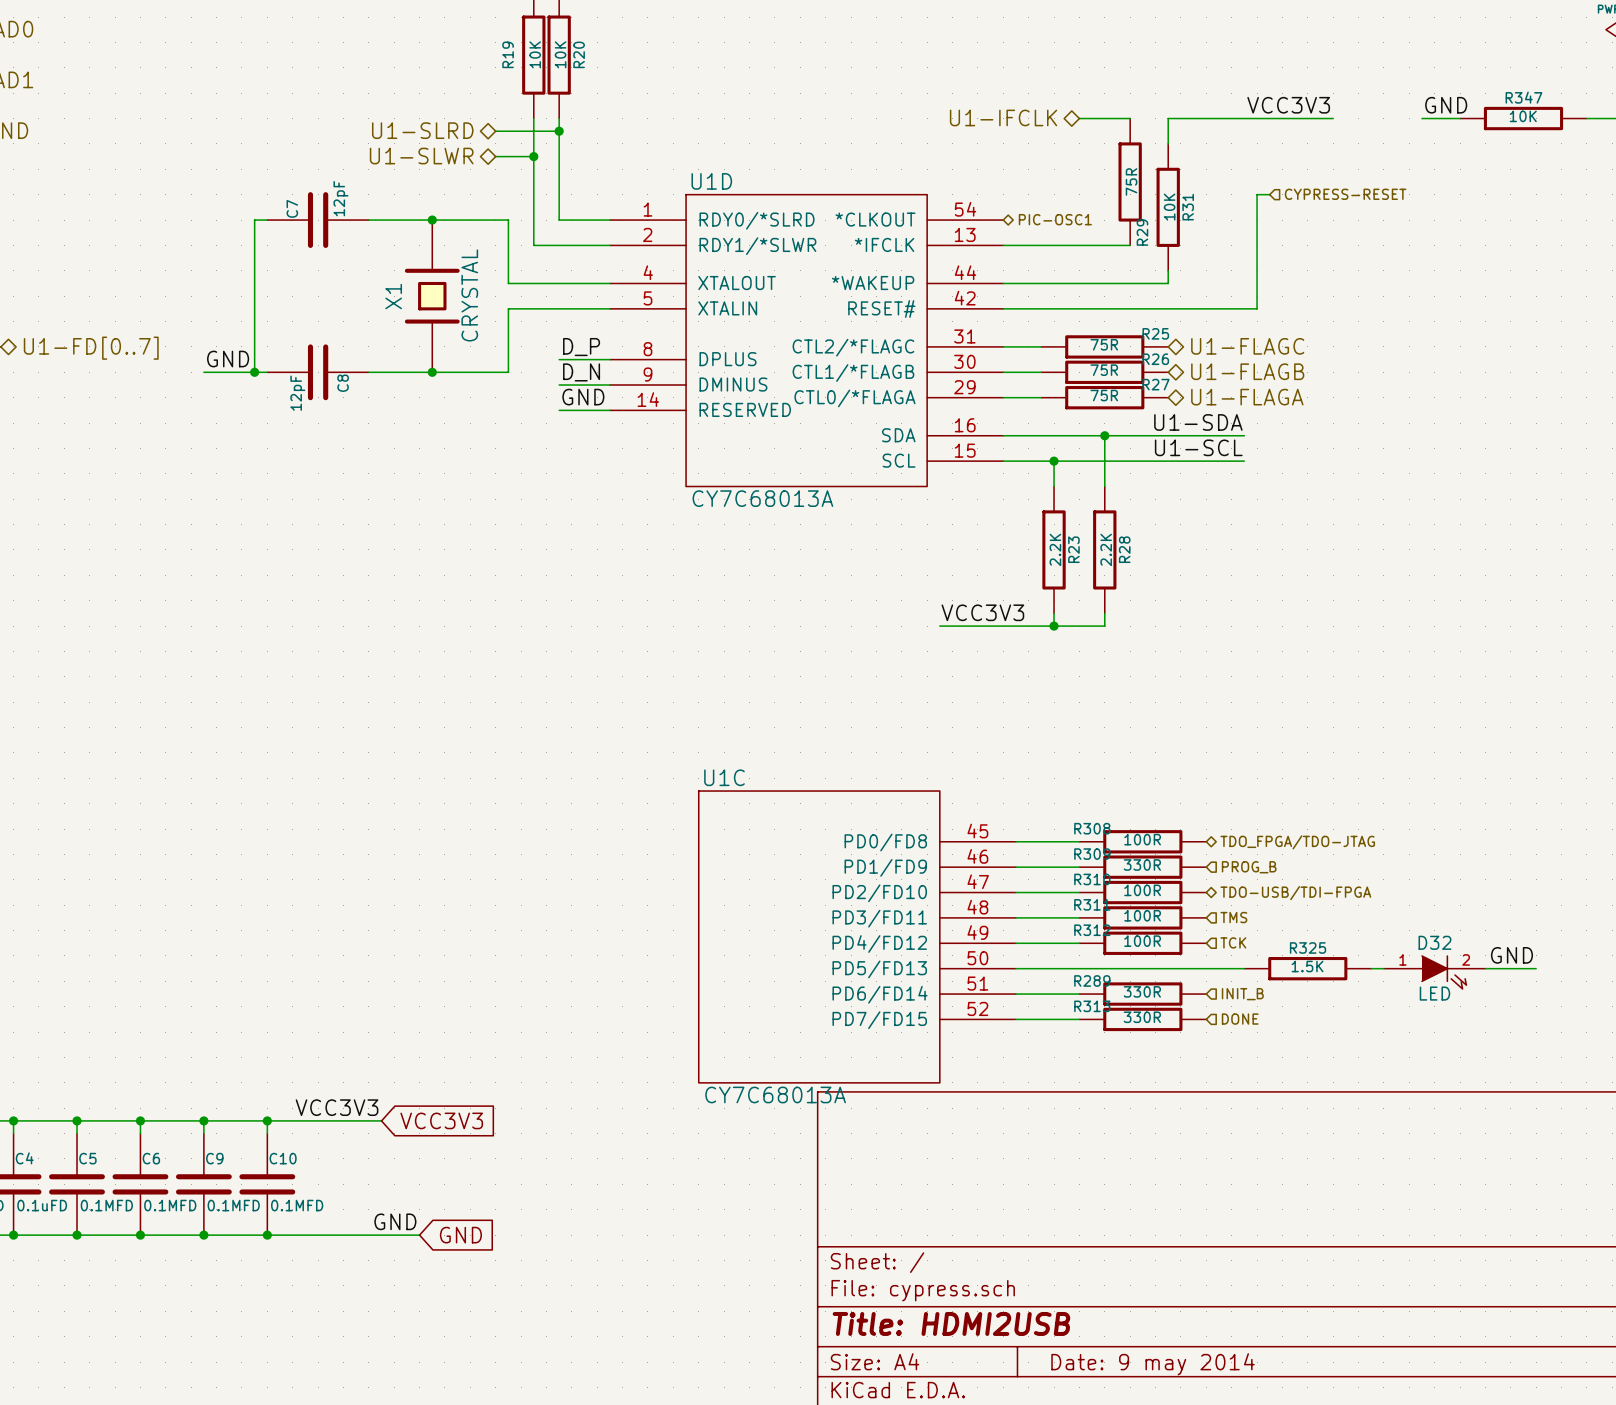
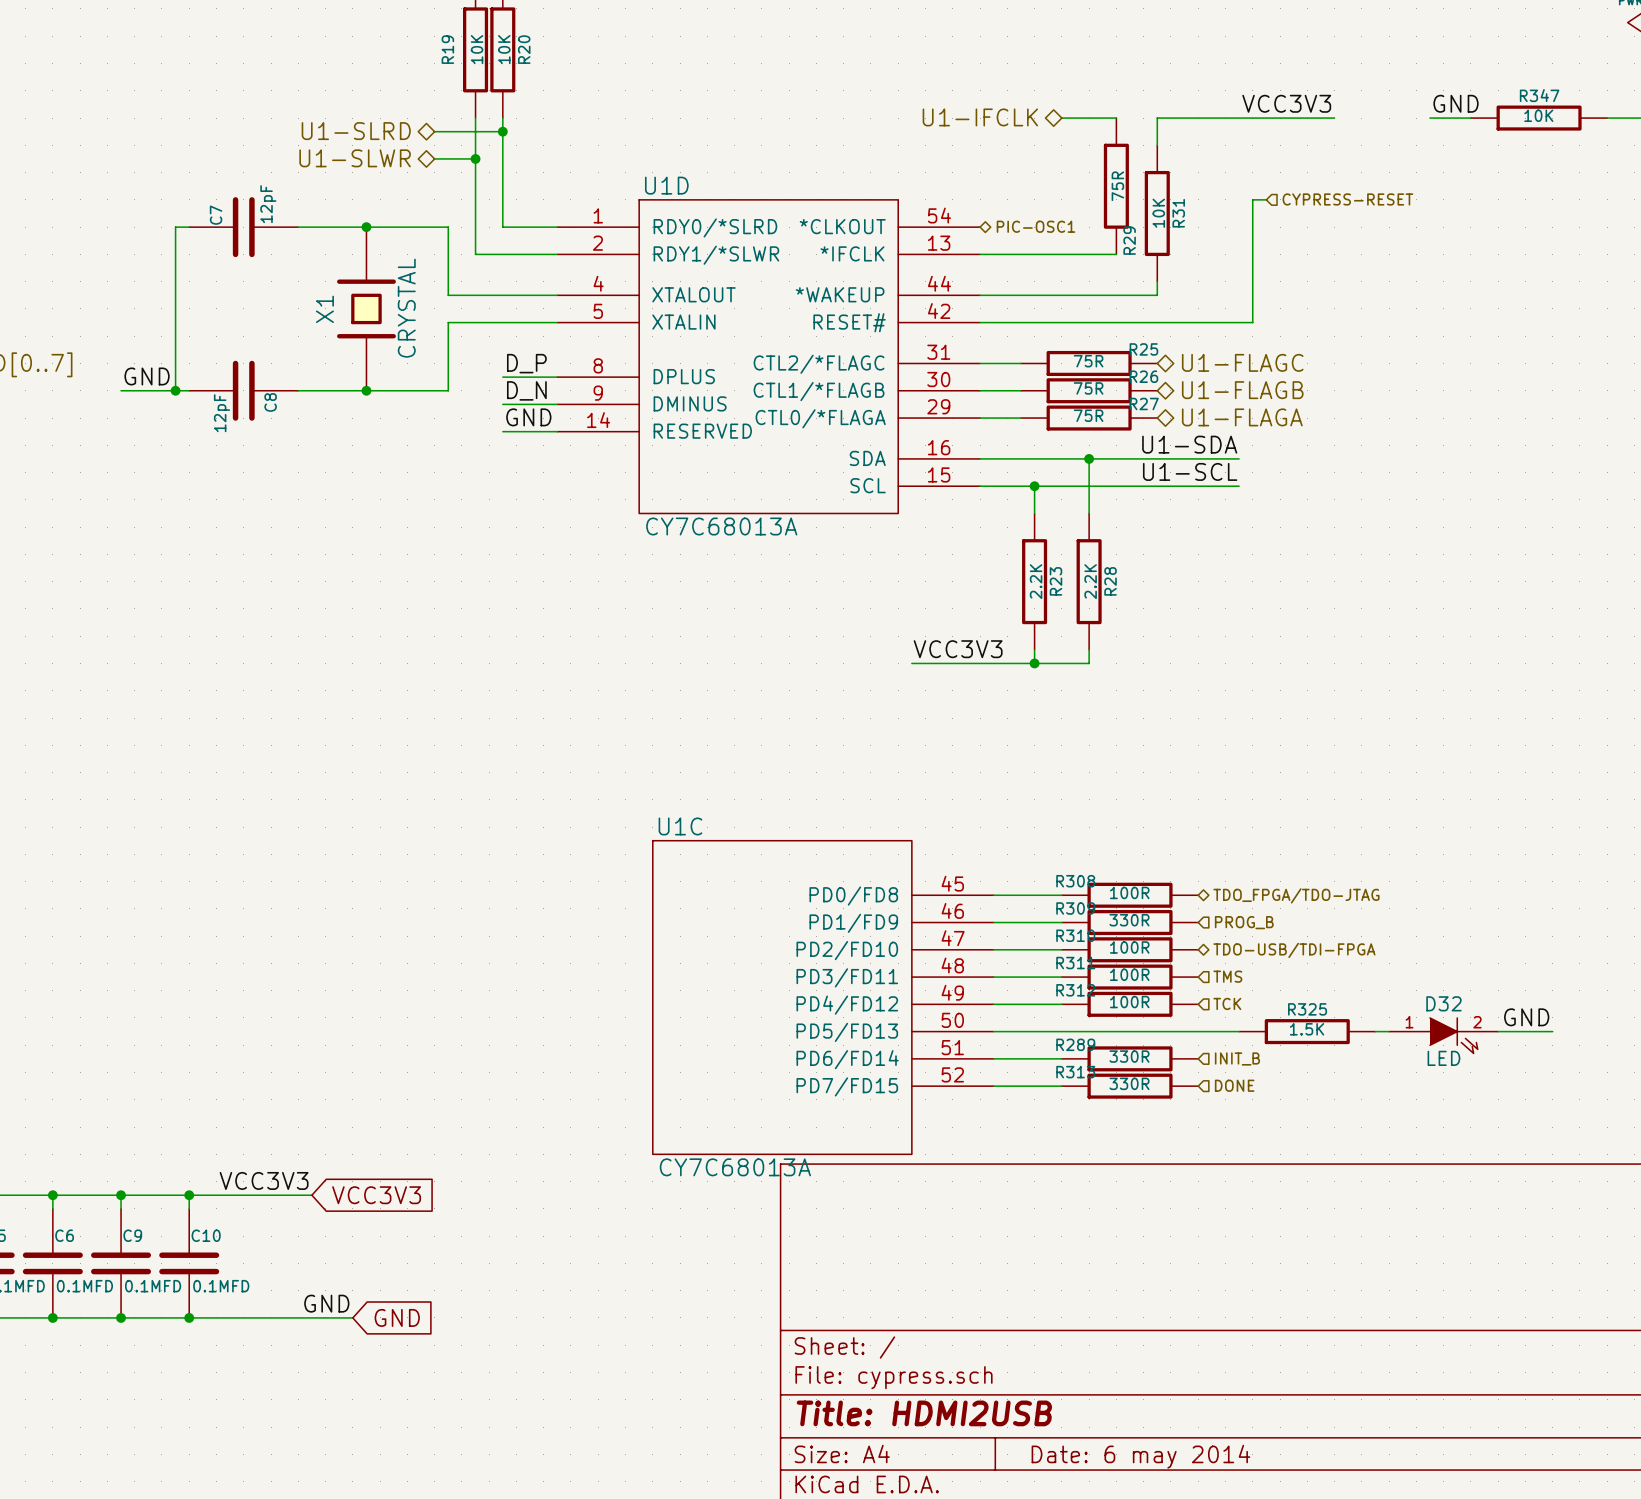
title block: Date: 9 may 2014 (1153, 1364) -> Date: 6 may 2014 (1140, 1456)

